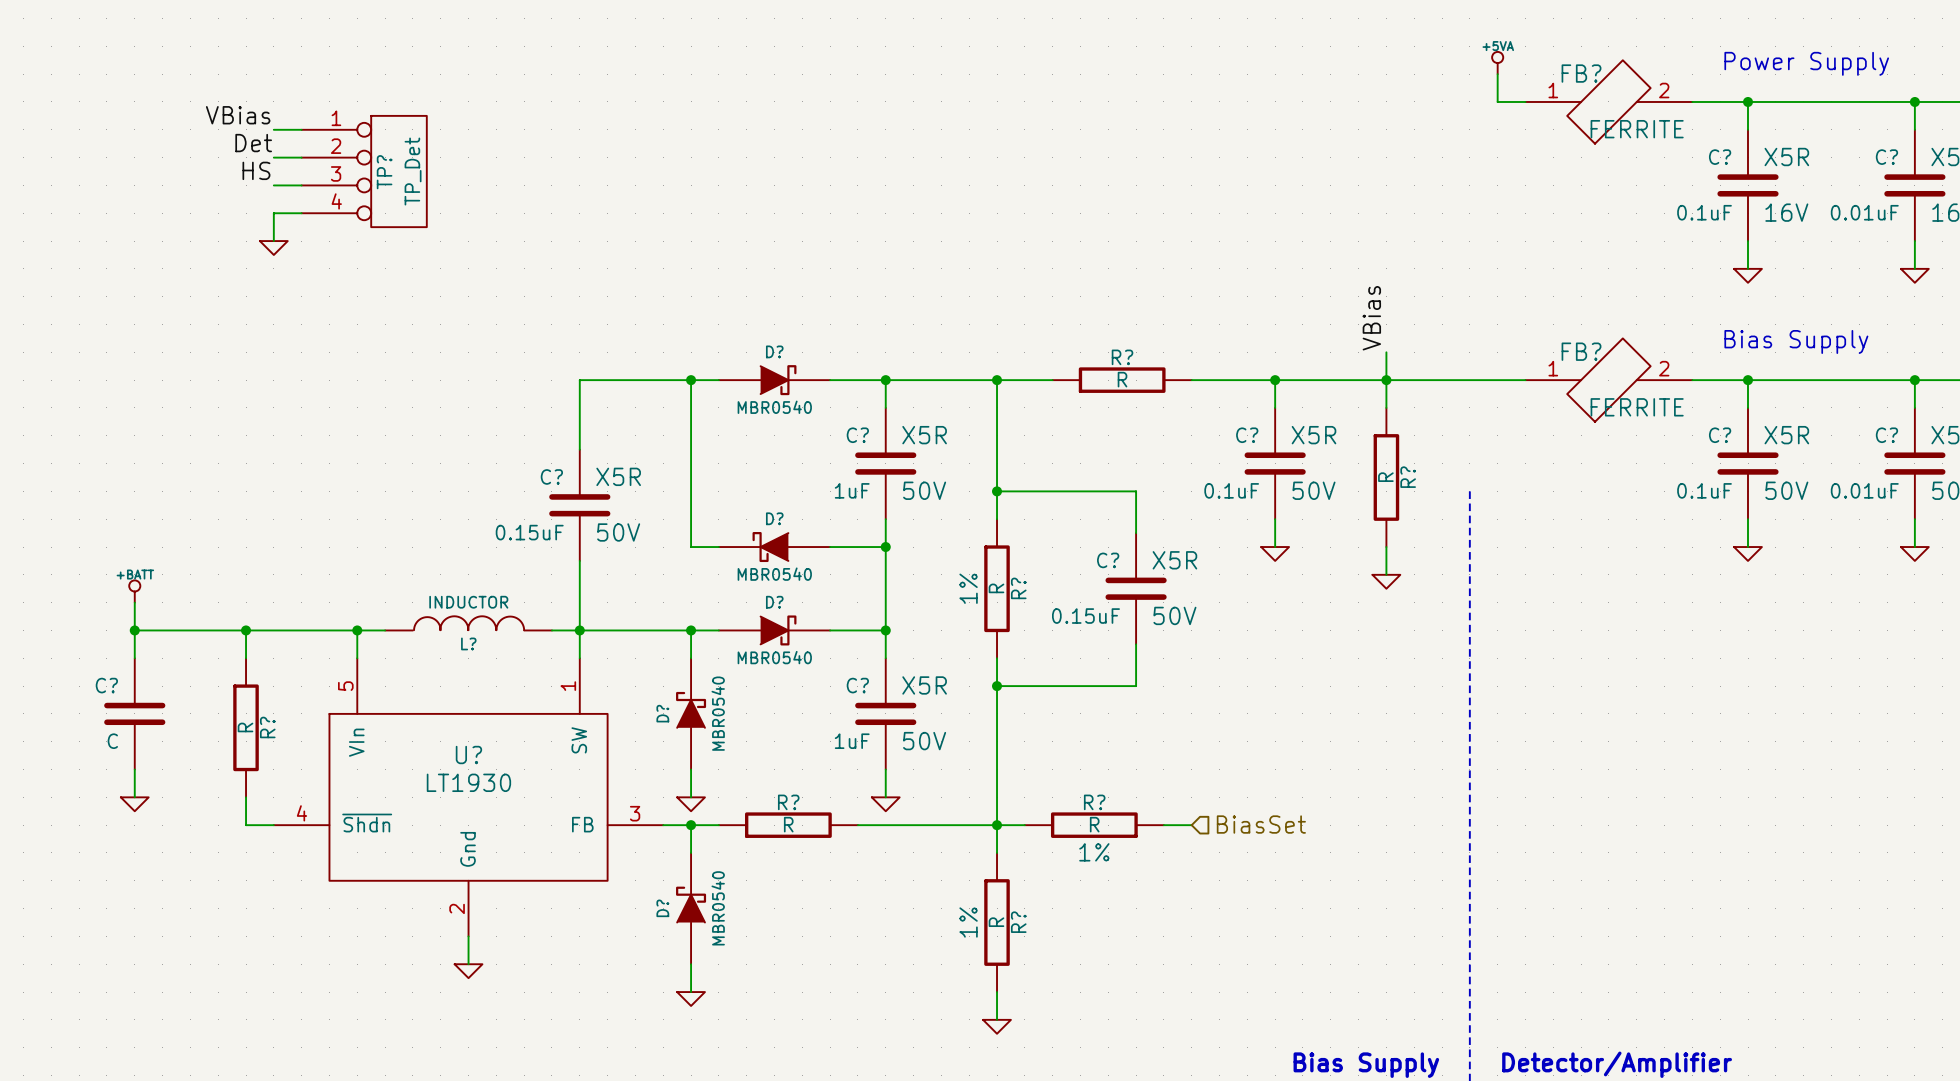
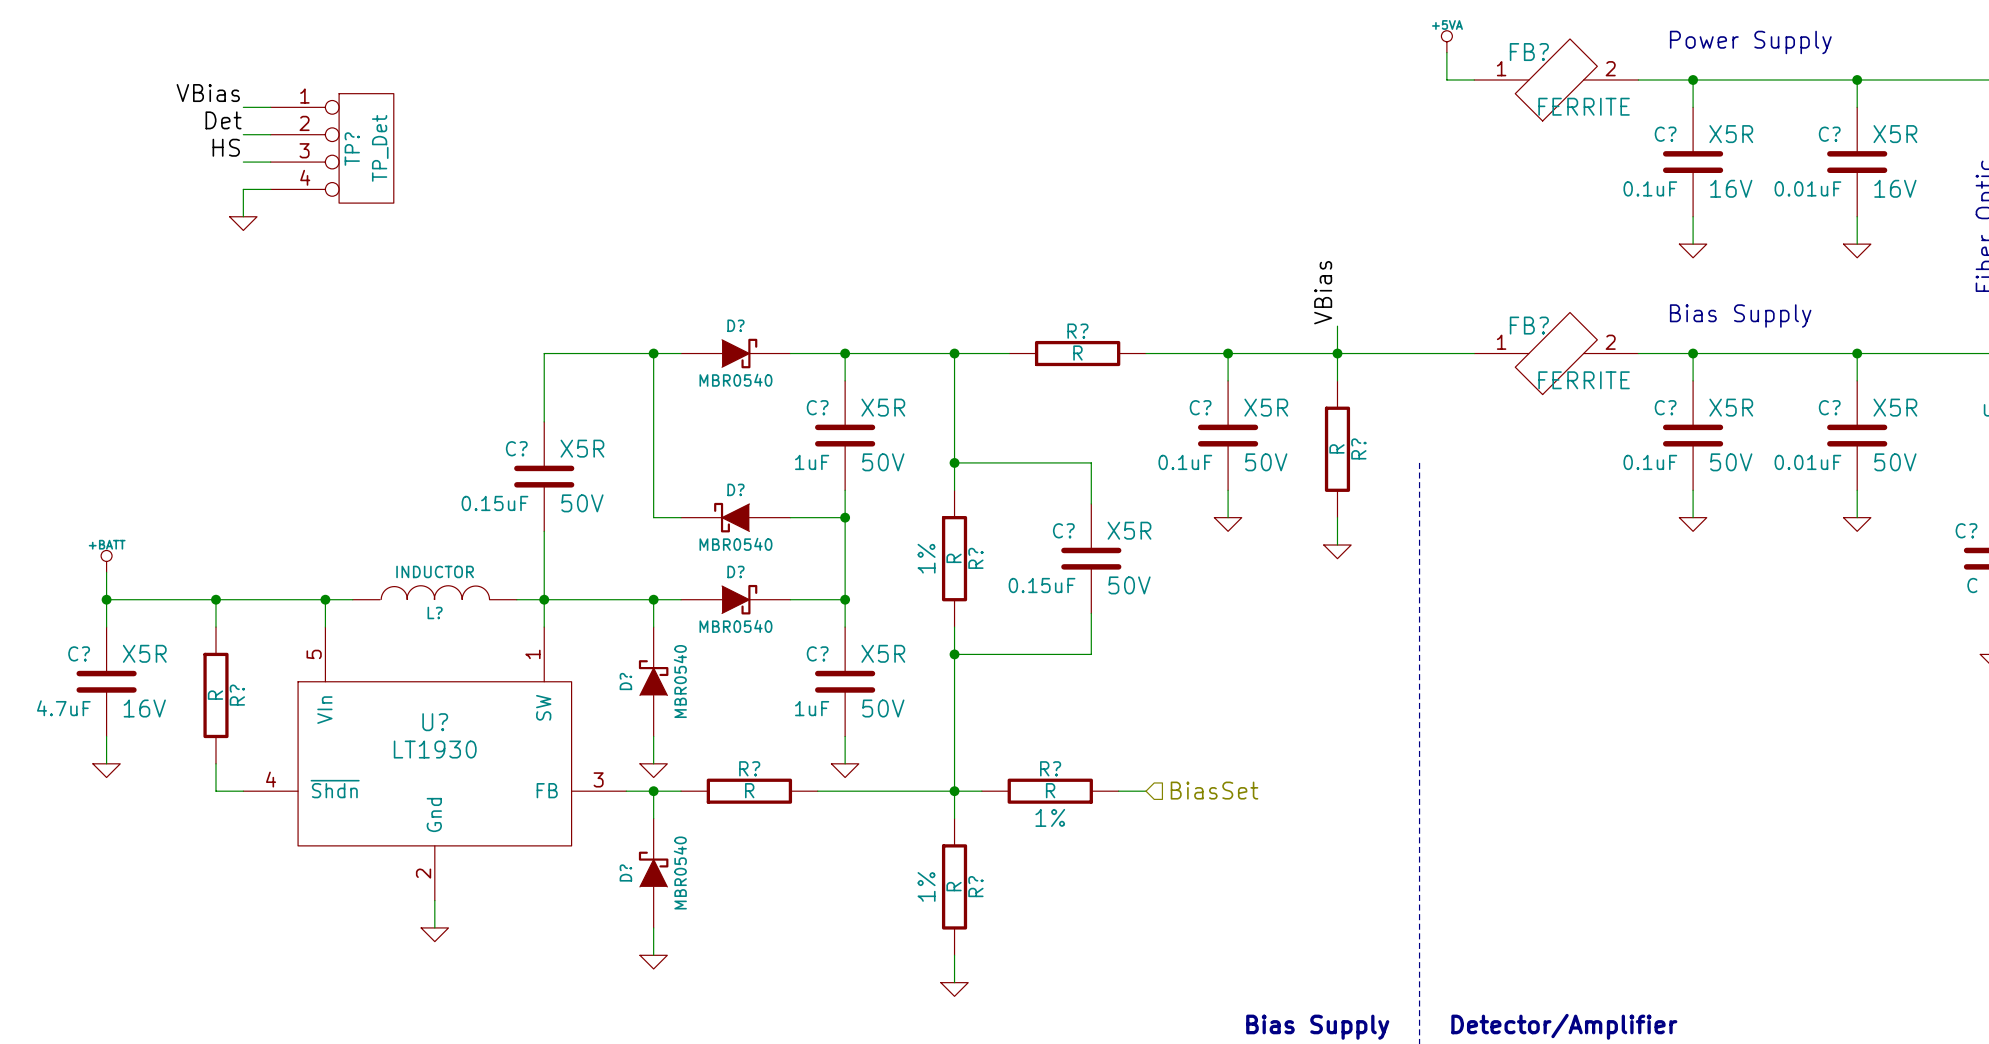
C? text: none -> X5R (144, 653)
C? value: C (112, 741) -> 4.7uF (63, 708)
C? text: none -> 16V (144, 708)

